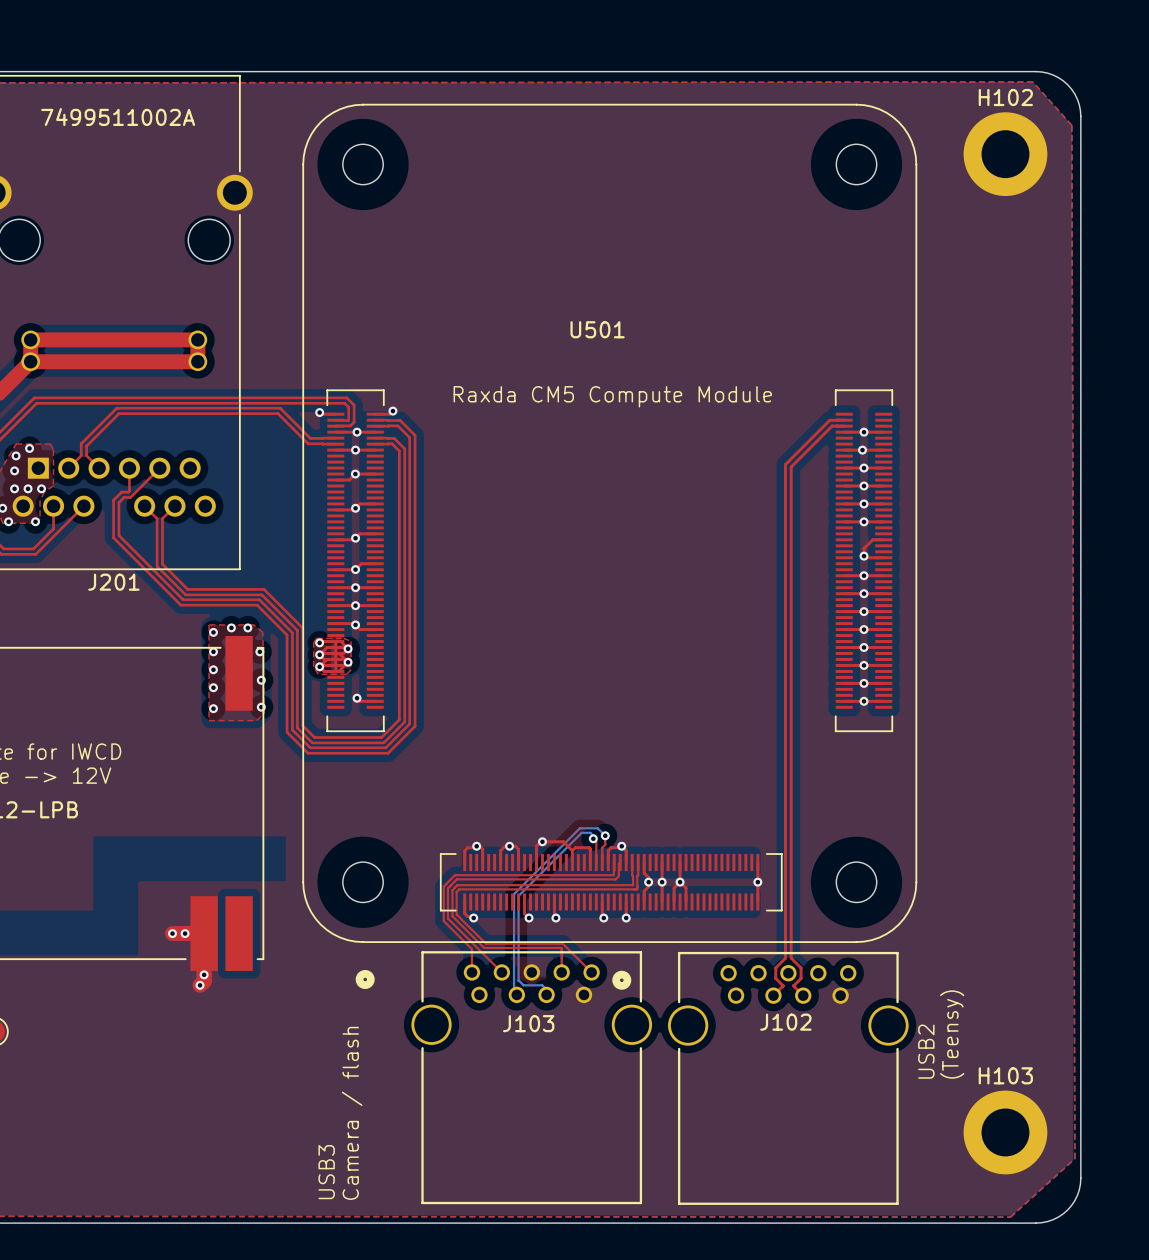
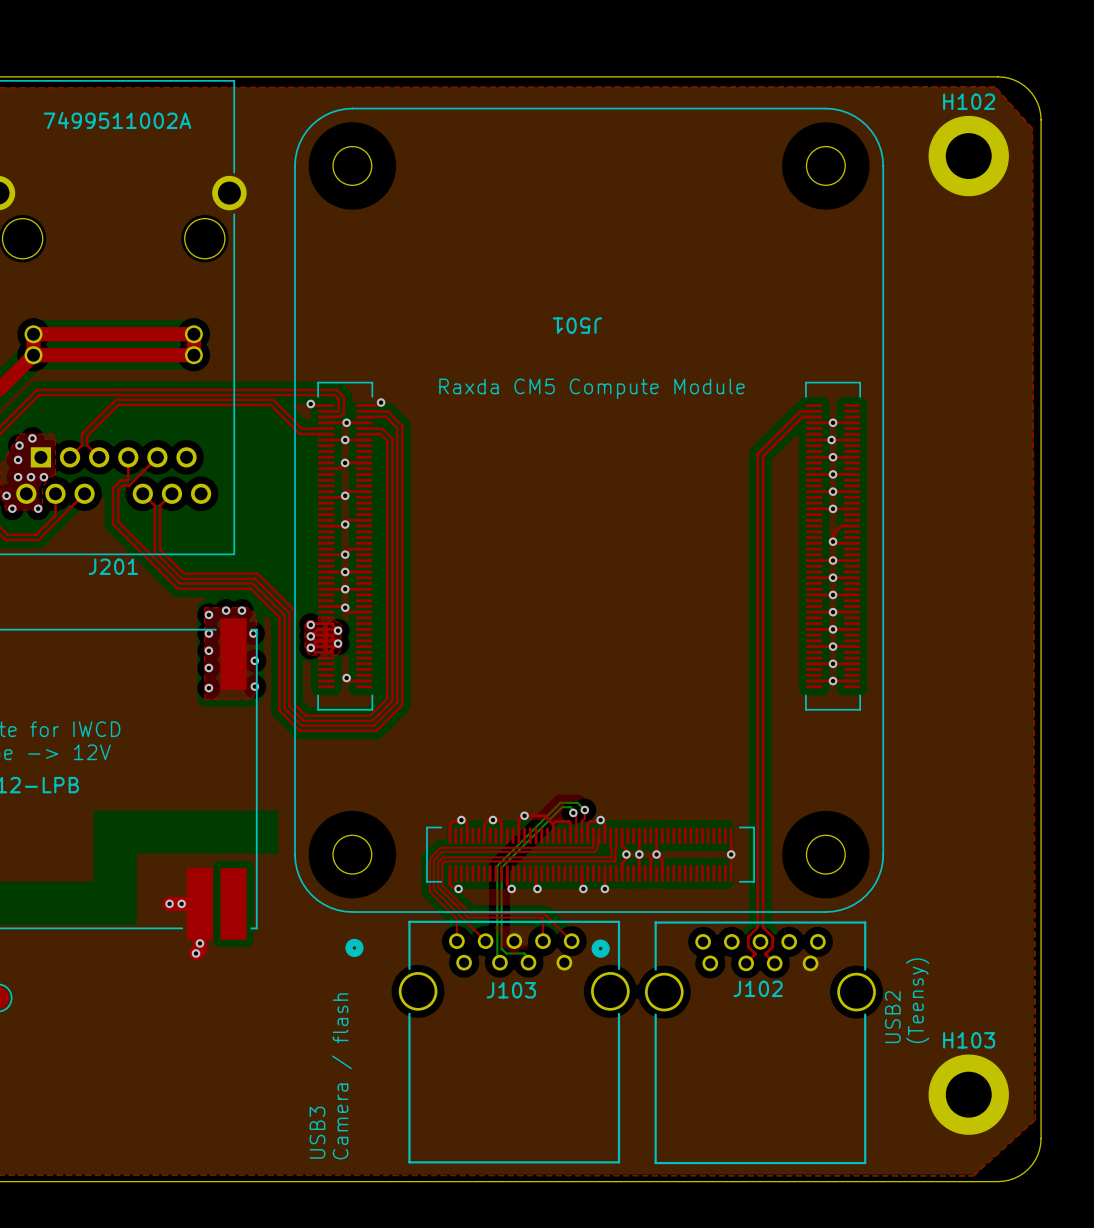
U501 name: U501 (597, 329) -> J501 (577, 325)

